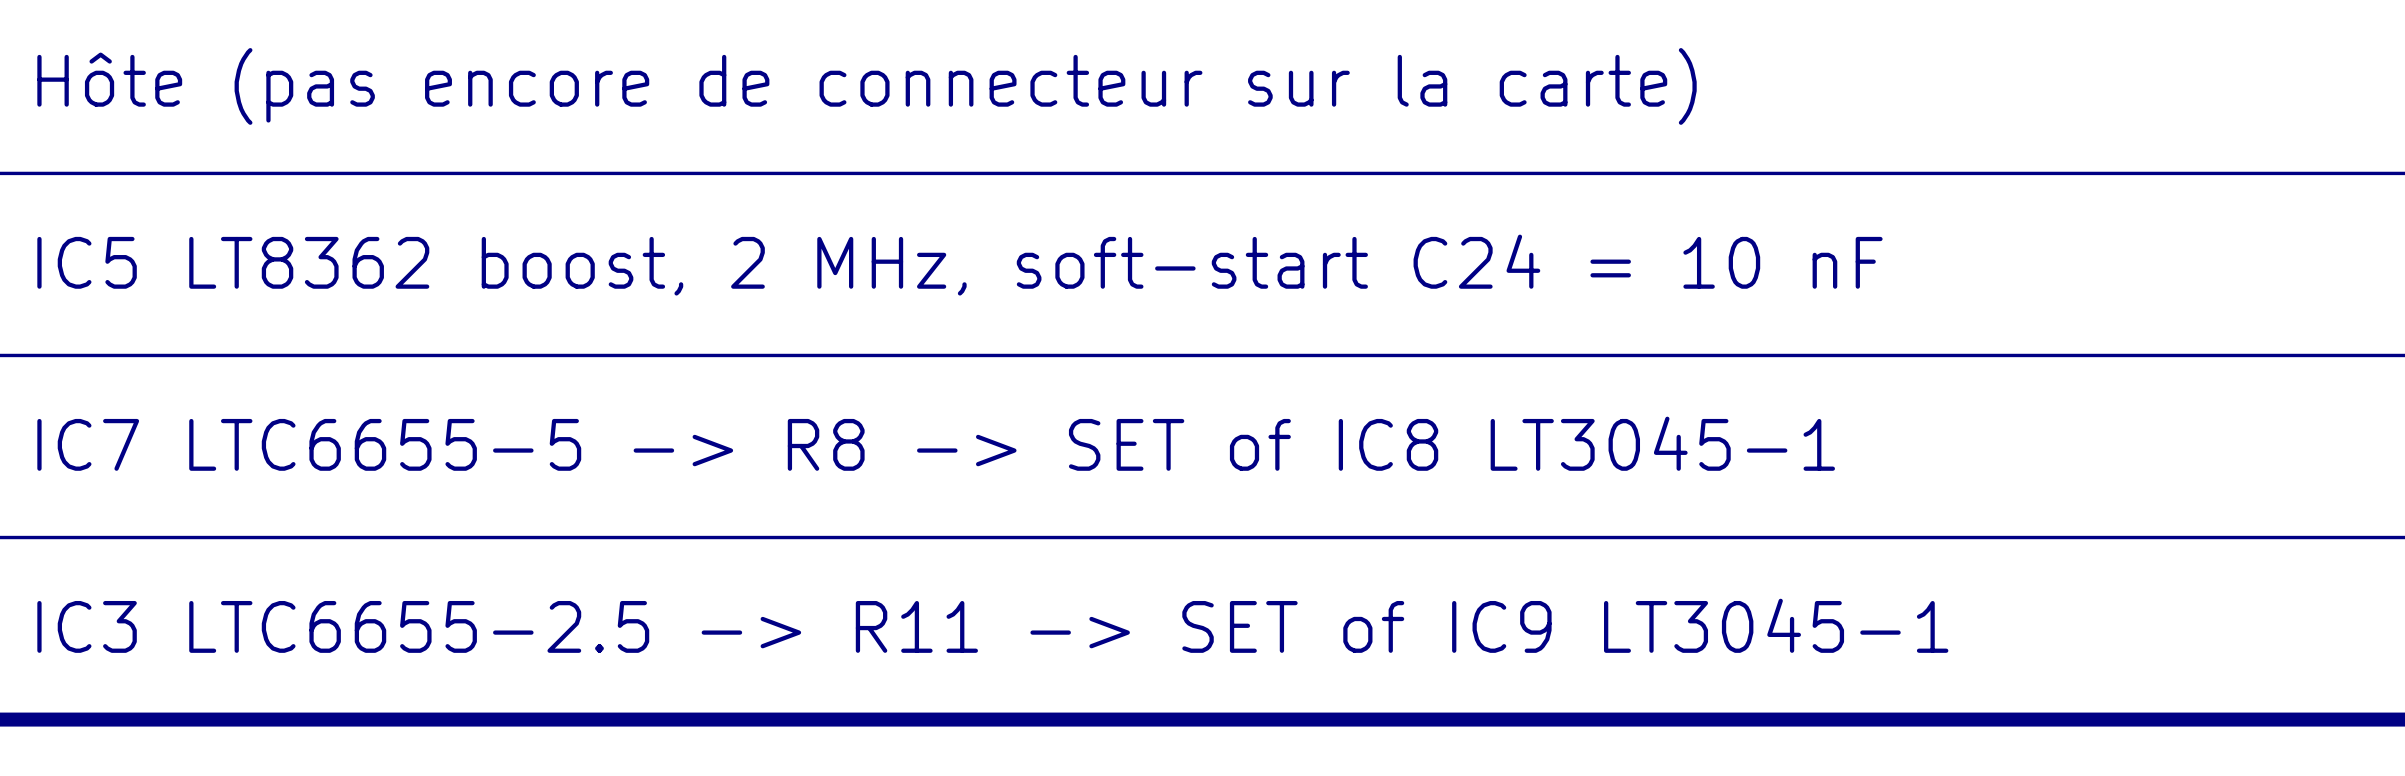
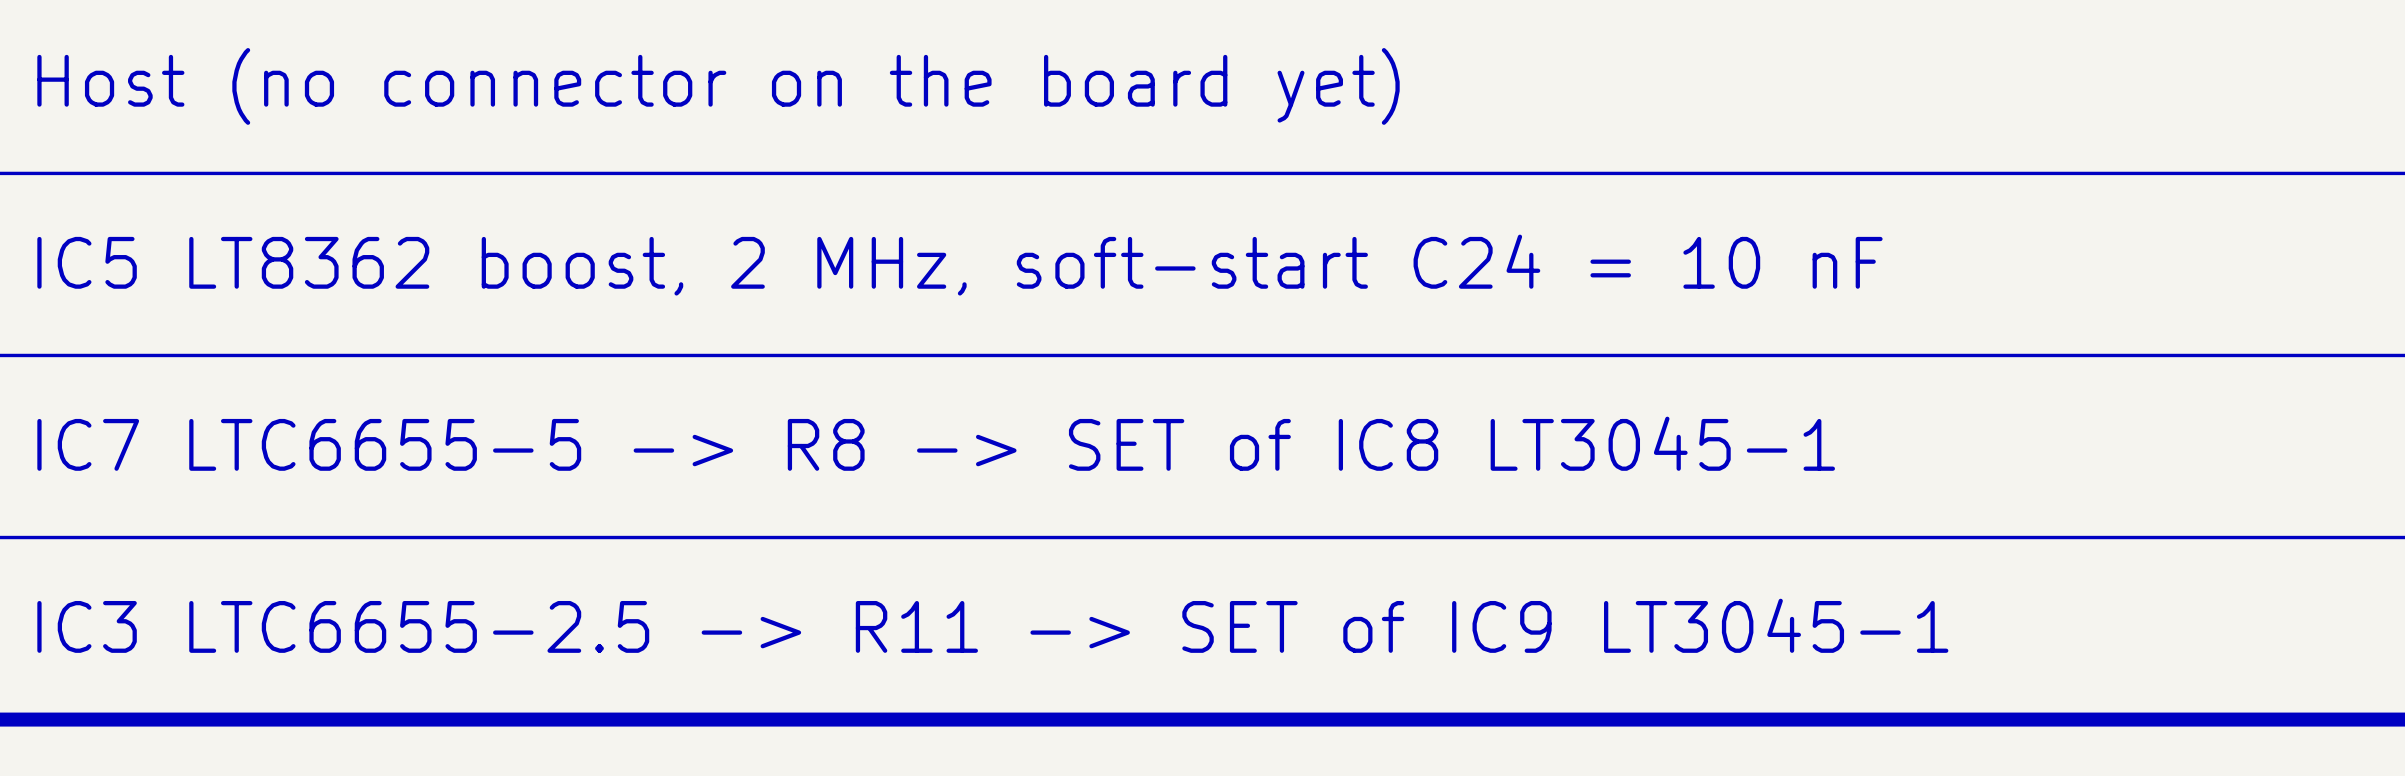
text: Hôte (pas encore de connecteur sur la carte) (867, 86) -> Host (no connector on the board yet) (718, 86)

